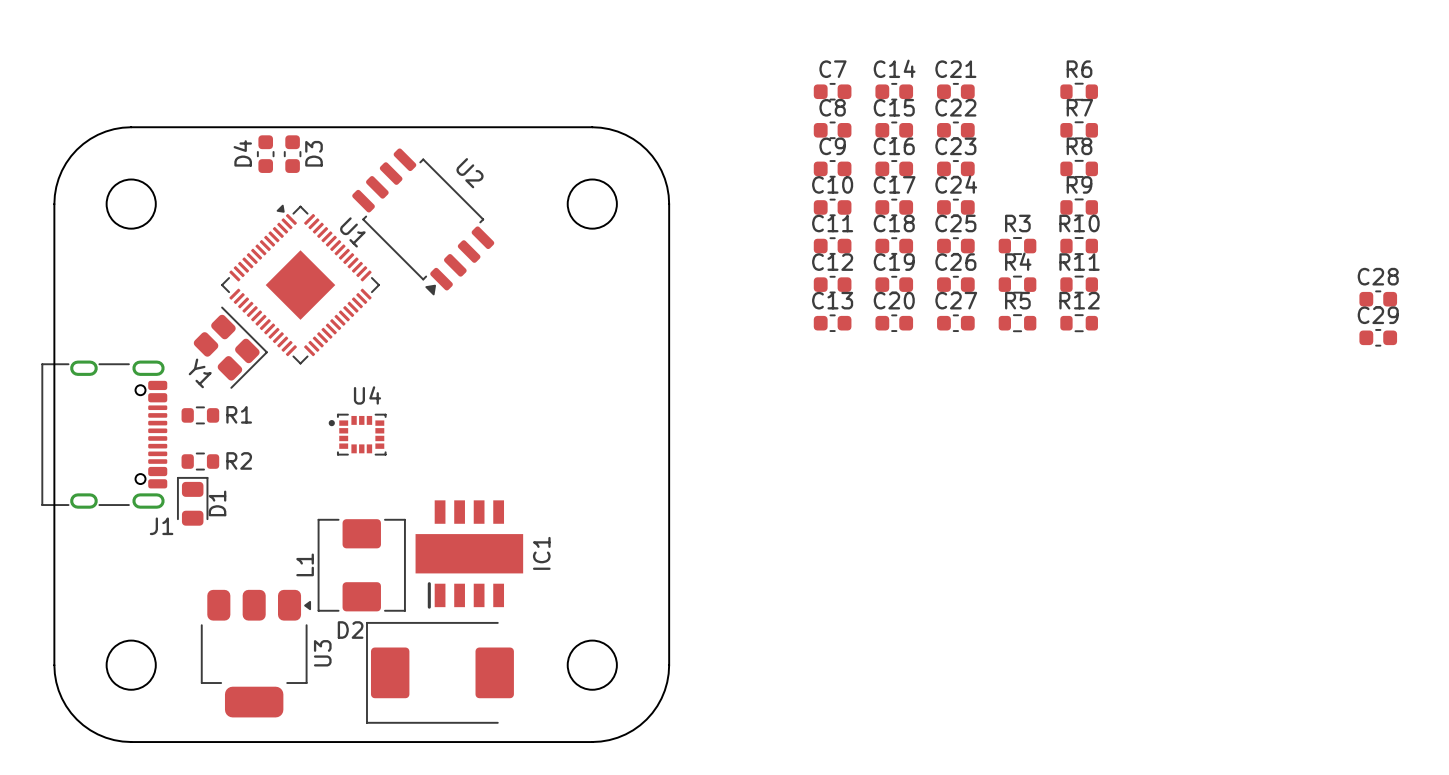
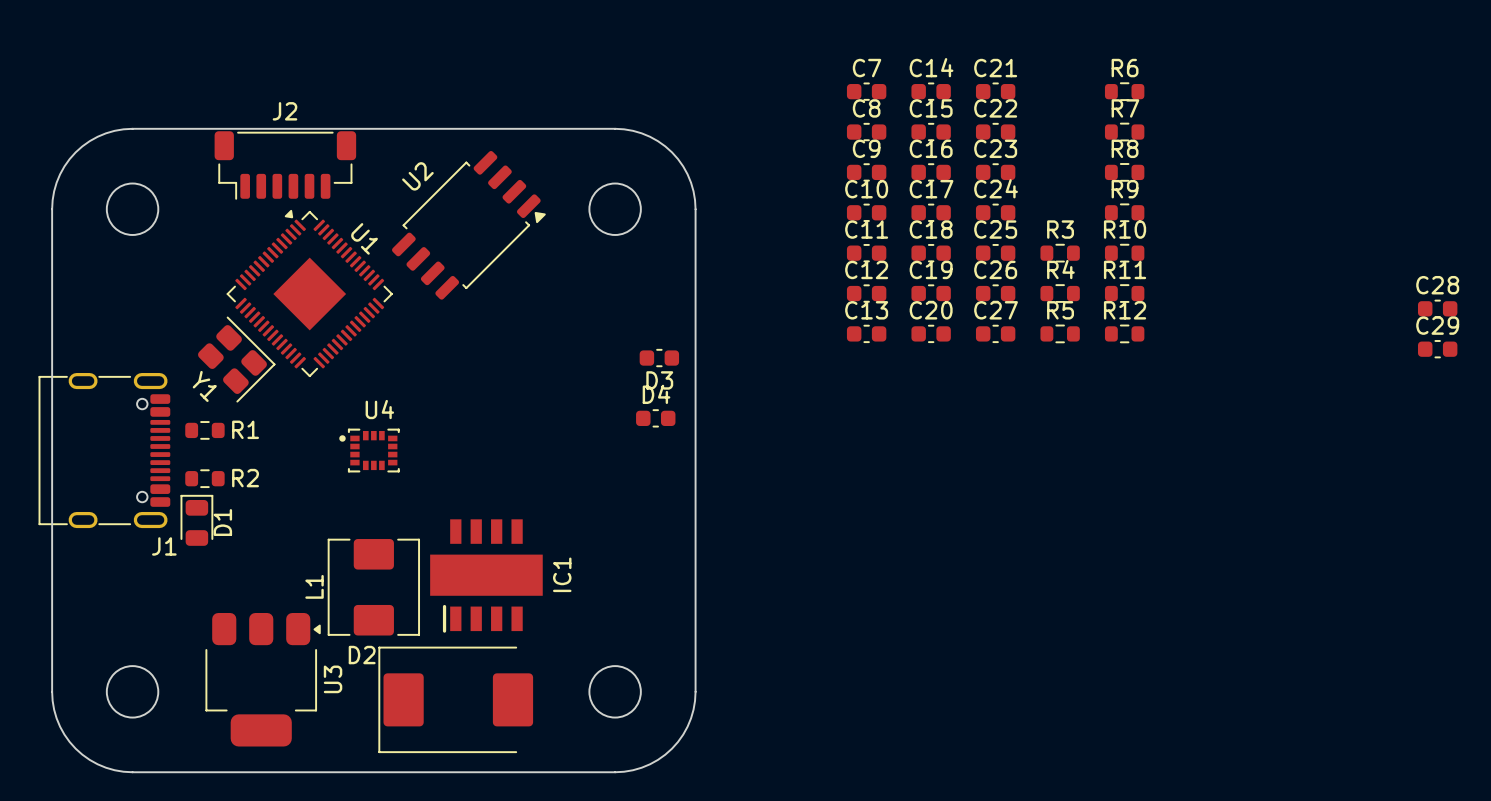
D4 rotation: 0° (265, 154) -> 90° clockwise (655, 418)
D4 position: (265, 154) -> (655, 418)
D3 rotation: 0° (292, 154) -> 90° clockwise (659, 358)
D3 position: (292, 154) -> (659, 358)
J2: none -> (285, 165)
U2 rotation: 0° (423, 221) -> 90° counterclockwise (468, 225)

